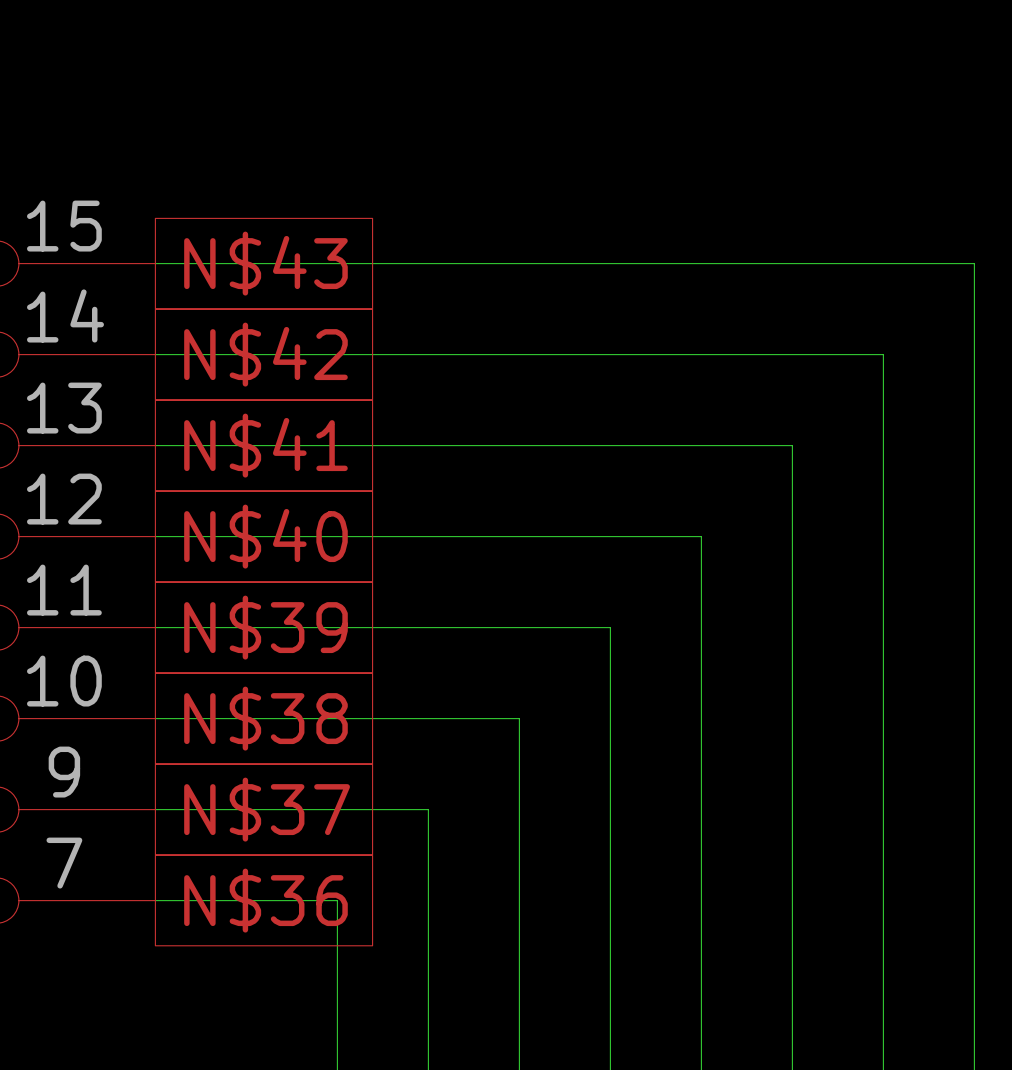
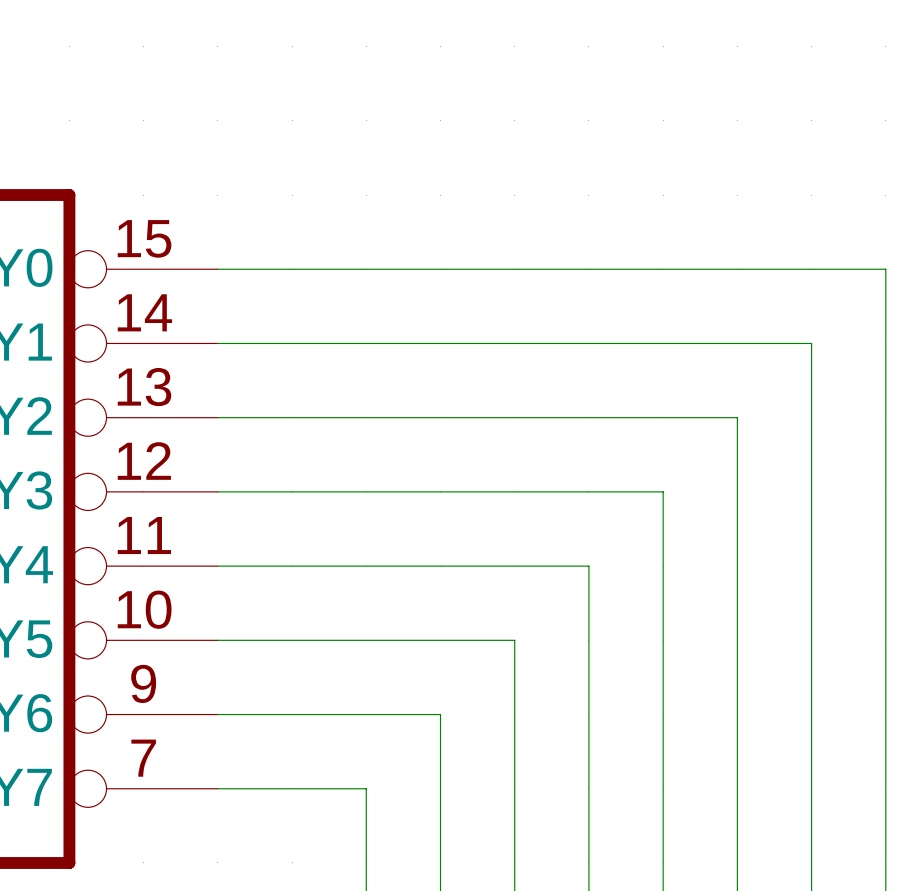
global label: N$43 (265, 263) -> none
global label: N$42 (265, 354) -> none
global label: N$41 (265, 445) -> none
global label: N$40 (265, 536) -> none
global label: N$39 (265, 627) -> none
global label: N$38 (265, 718) -> none
global label: N$37 (267, 809) -> none
global label: N$36 (265, 900) -> none

